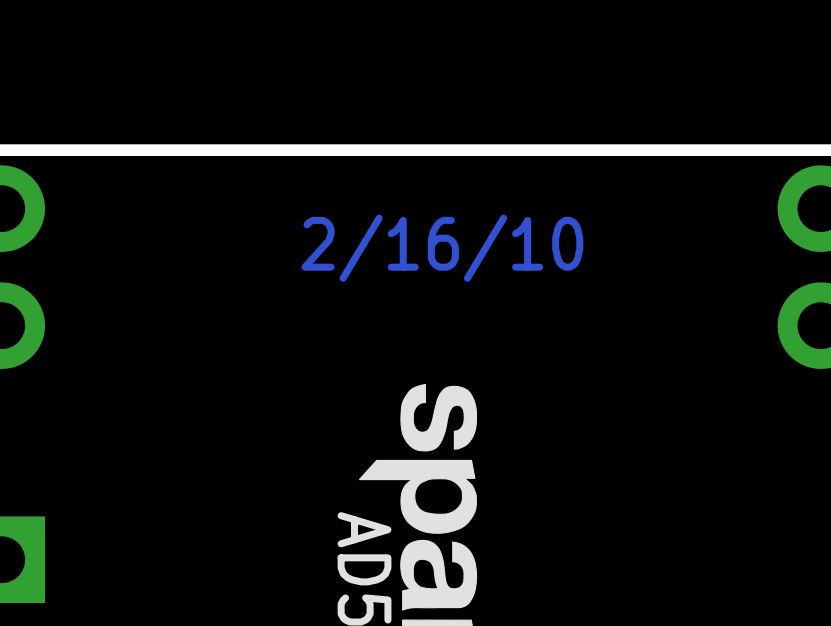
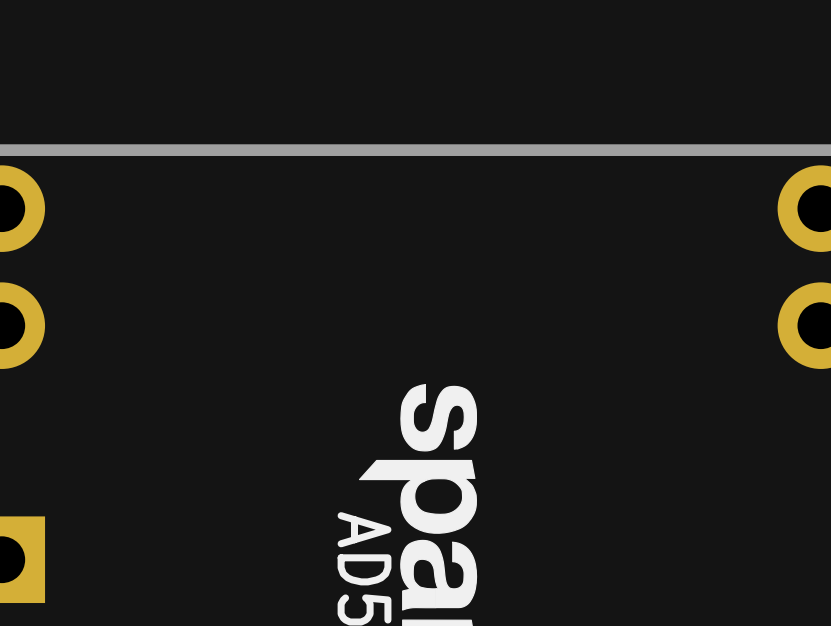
text: 2/16/10 (442, 248) -> none

